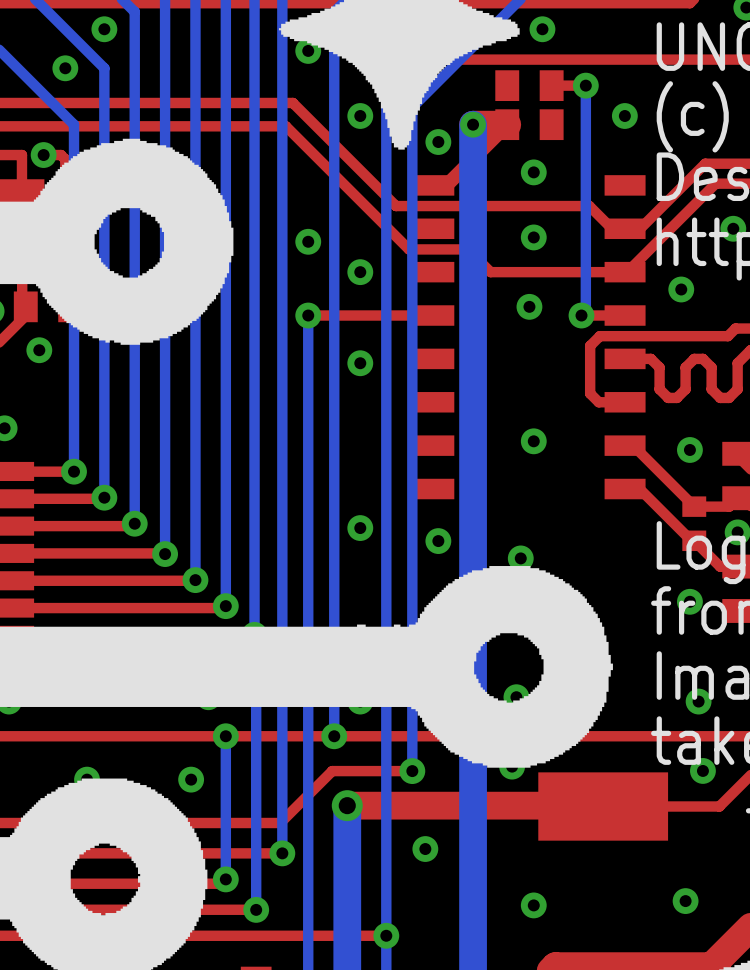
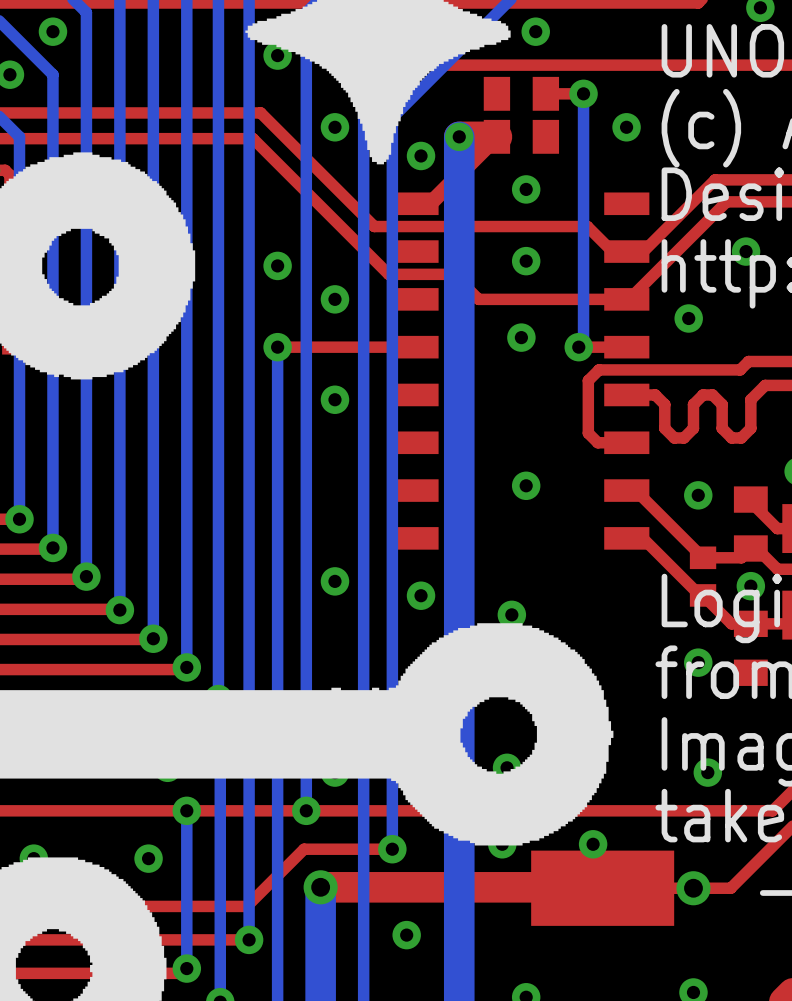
via: none -> (593, 844)
via: (702, 770) -> none
via: none -> (693, 888)

